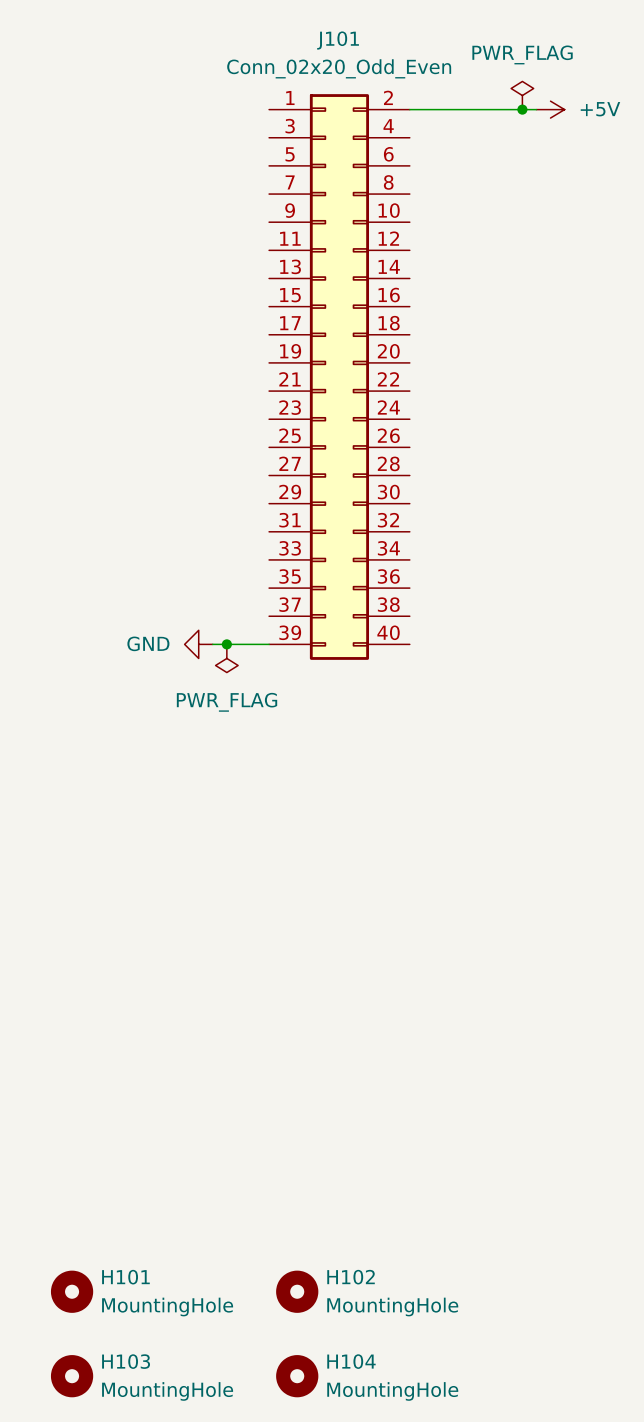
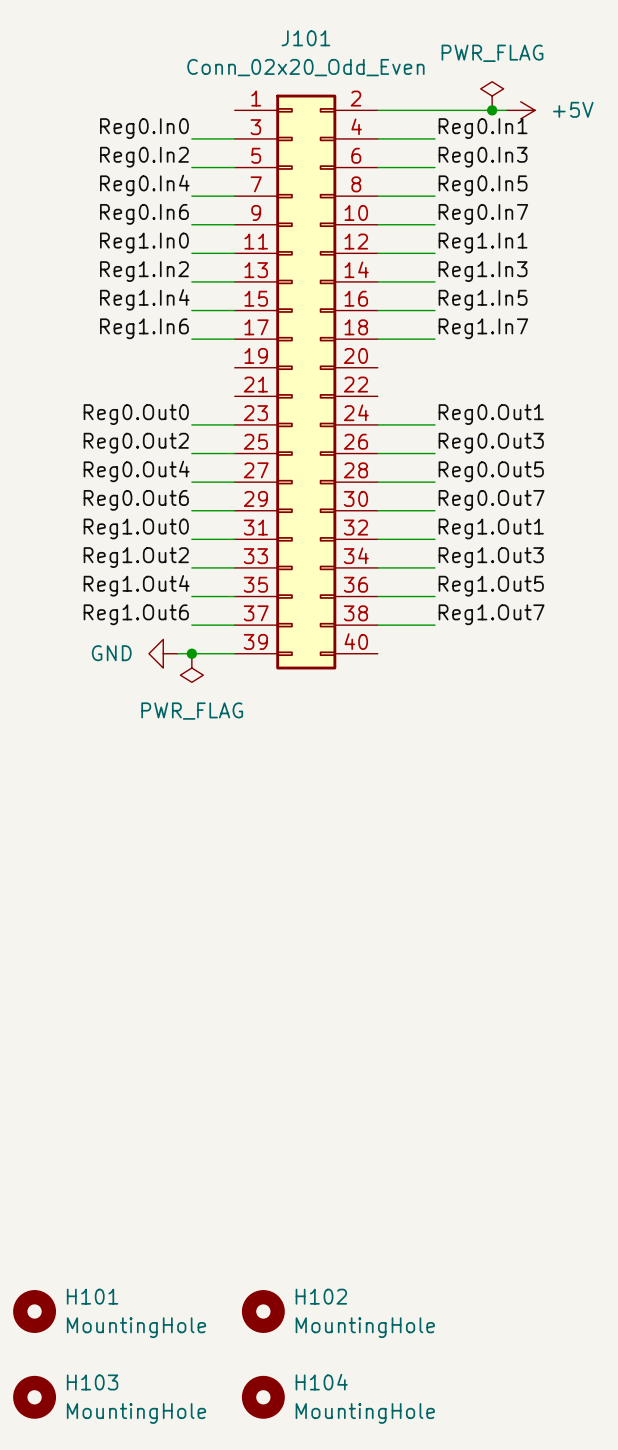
label: none -> Reg0.In0 (144, 128)
label: none -> Reg0.In1 (483, 128)
wire: none -> (191, 138) (234, 138)
wire: none -> (377, 138) (434, 138)
label: none -> Reg0.In2 (144, 157)
label: none -> Reg0.In3 (483, 157)
wire: none -> (191, 167) (234, 167)
wire: none -> (377, 167) (434, 167)
label: none -> Reg0.In4 (144, 185)
label: none -> Reg0.In5 (483, 185)
wire: none -> (191, 196) (234, 196)
wire: none -> (377, 196) (434, 196)
label: none -> Reg0.In6 (144, 214)
label: none -> Reg0.In7 (483, 214)
wire: none -> (191, 224) (234, 224)
wire: none -> (377, 224) (434, 224)
label: none -> Reg1.In0 (144, 242)
label: none -> Reg1.In1 (483, 242)
wire: none -> (191, 253) (234, 253)
wire: none -> (377, 253) (434, 253)
label: none -> Reg1.In2 (144, 271)
label: none -> Reg1.In3 (483, 271)
wire: none -> (191, 281) (234, 281)
wire: none -> (377, 281) (434, 281)
label: none -> Reg1.In4 (144, 299)
label: none -> Reg1.In5 (483, 300)
wire: none -> (191, 310) (234, 310)
wire: none -> (377, 310) (434, 310)
label: none -> Reg1.In6 (144, 328)
label: none -> Reg1.In7 (483, 328)
wire: none -> (191, 339) (234, 339)
wire: none -> (377, 339) (434, 339)
label: none -> Reg0.Out0 (136, 414)
label: none -> Reg0.Out1 (491, 414)
wire: none -> (191, 424) (234, 424)
wire: none -> (377, 424) (434, 424)
label: none -> Reg0.Out2 (136, 443)
label: none -> Reg0.Out3 (491, 443)
wire: none -> (191, 453) (234, 453)
wire: none -> (377, 453) (434, 453)
label: none -> Reg0.Out4 (136, 471)
label: none -> Reg0.Out5 (491, 471)
wire: none -> (191, 482) (234, 482)
wire: none -> (377, 482) (434, 482)
label: none -> Reg0.Out6 (136, 500)
label: none -> Reg0.Out7 (491, 500)
wire: none -> (191, 510) (234, 510)
wire: none -> (377, 510) (434, 510)
label: none -> Reg1.Out0 (136, 528)
label: none -> Reg1.Out1 (491, 528)
wire: none -> (191, 539) (234, 539)
wire: none -> (377, 539) (434, 539)
label: none -> Reg1.Out2 (136, 557)
label: none -> Reg1.Out3 (491, 557)
wire: none -> (191, 567) (234, 567)
wire: none -> (377, 567) (434, 567)
label: none -> Reg1.Out4 (136, 585)
label: none -> Reg1.Out5 (491, 586)
wire: none -> (191, 596) (234, 596)
wire: none -> (377, 596) (434, 596)
label: none -> Reg1.Out6 (136, 614)
label: none -> Reg1.Out7 (491, 614)
wire: none -> (191, 625) (234, 625)
wire: none -> (377, 625) (434, 625)

